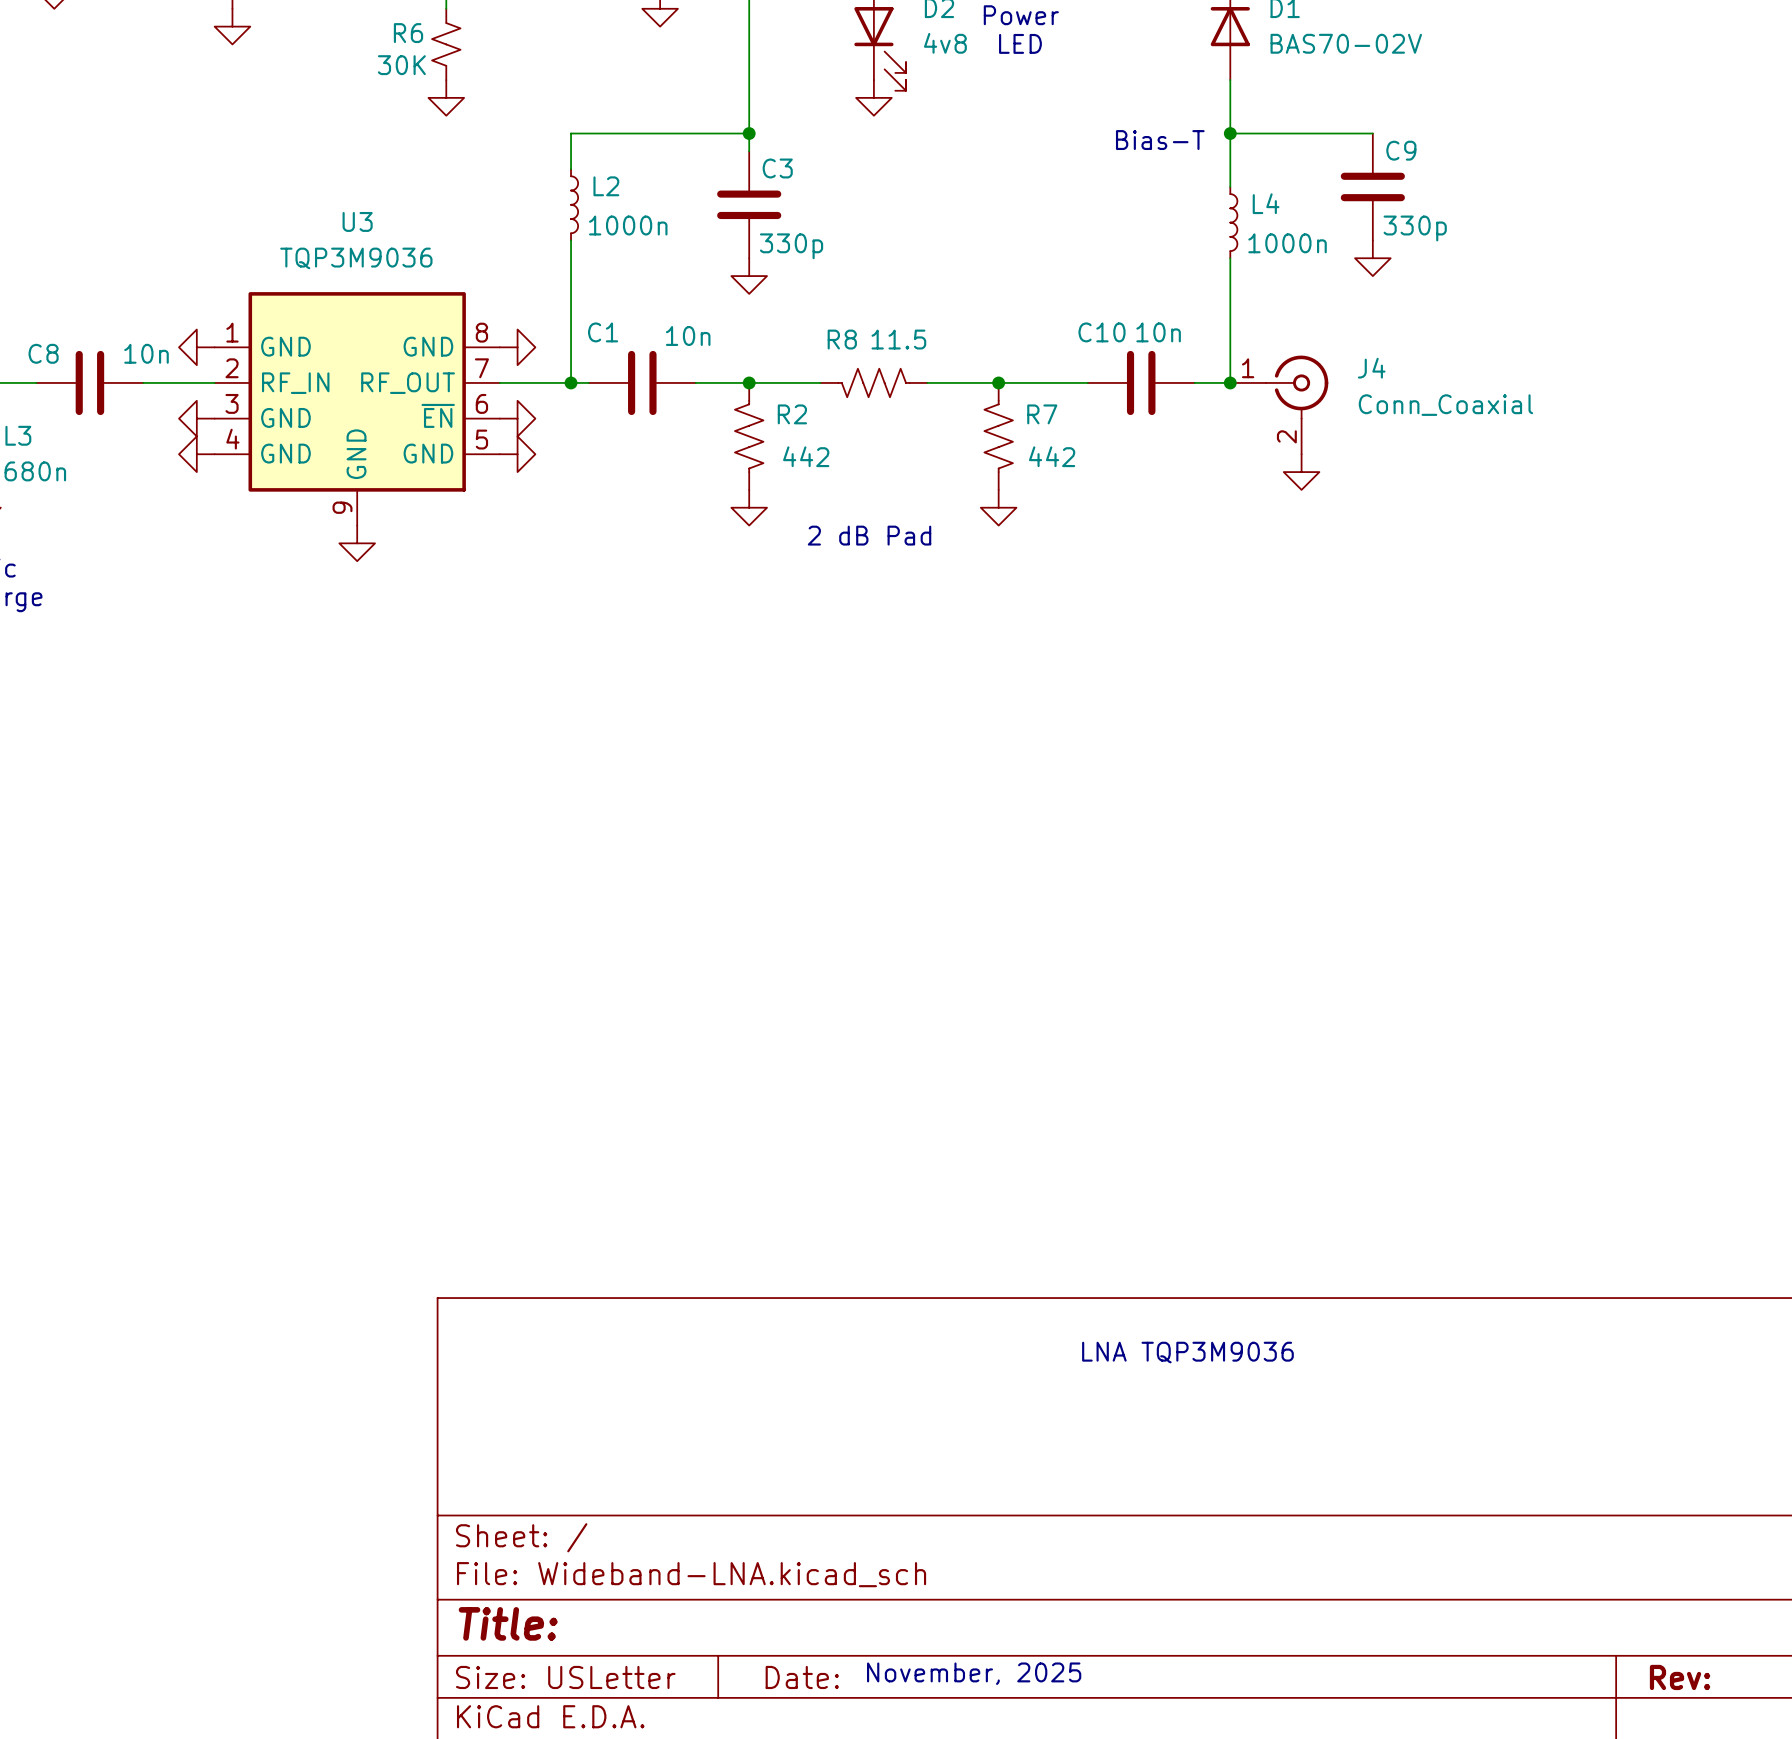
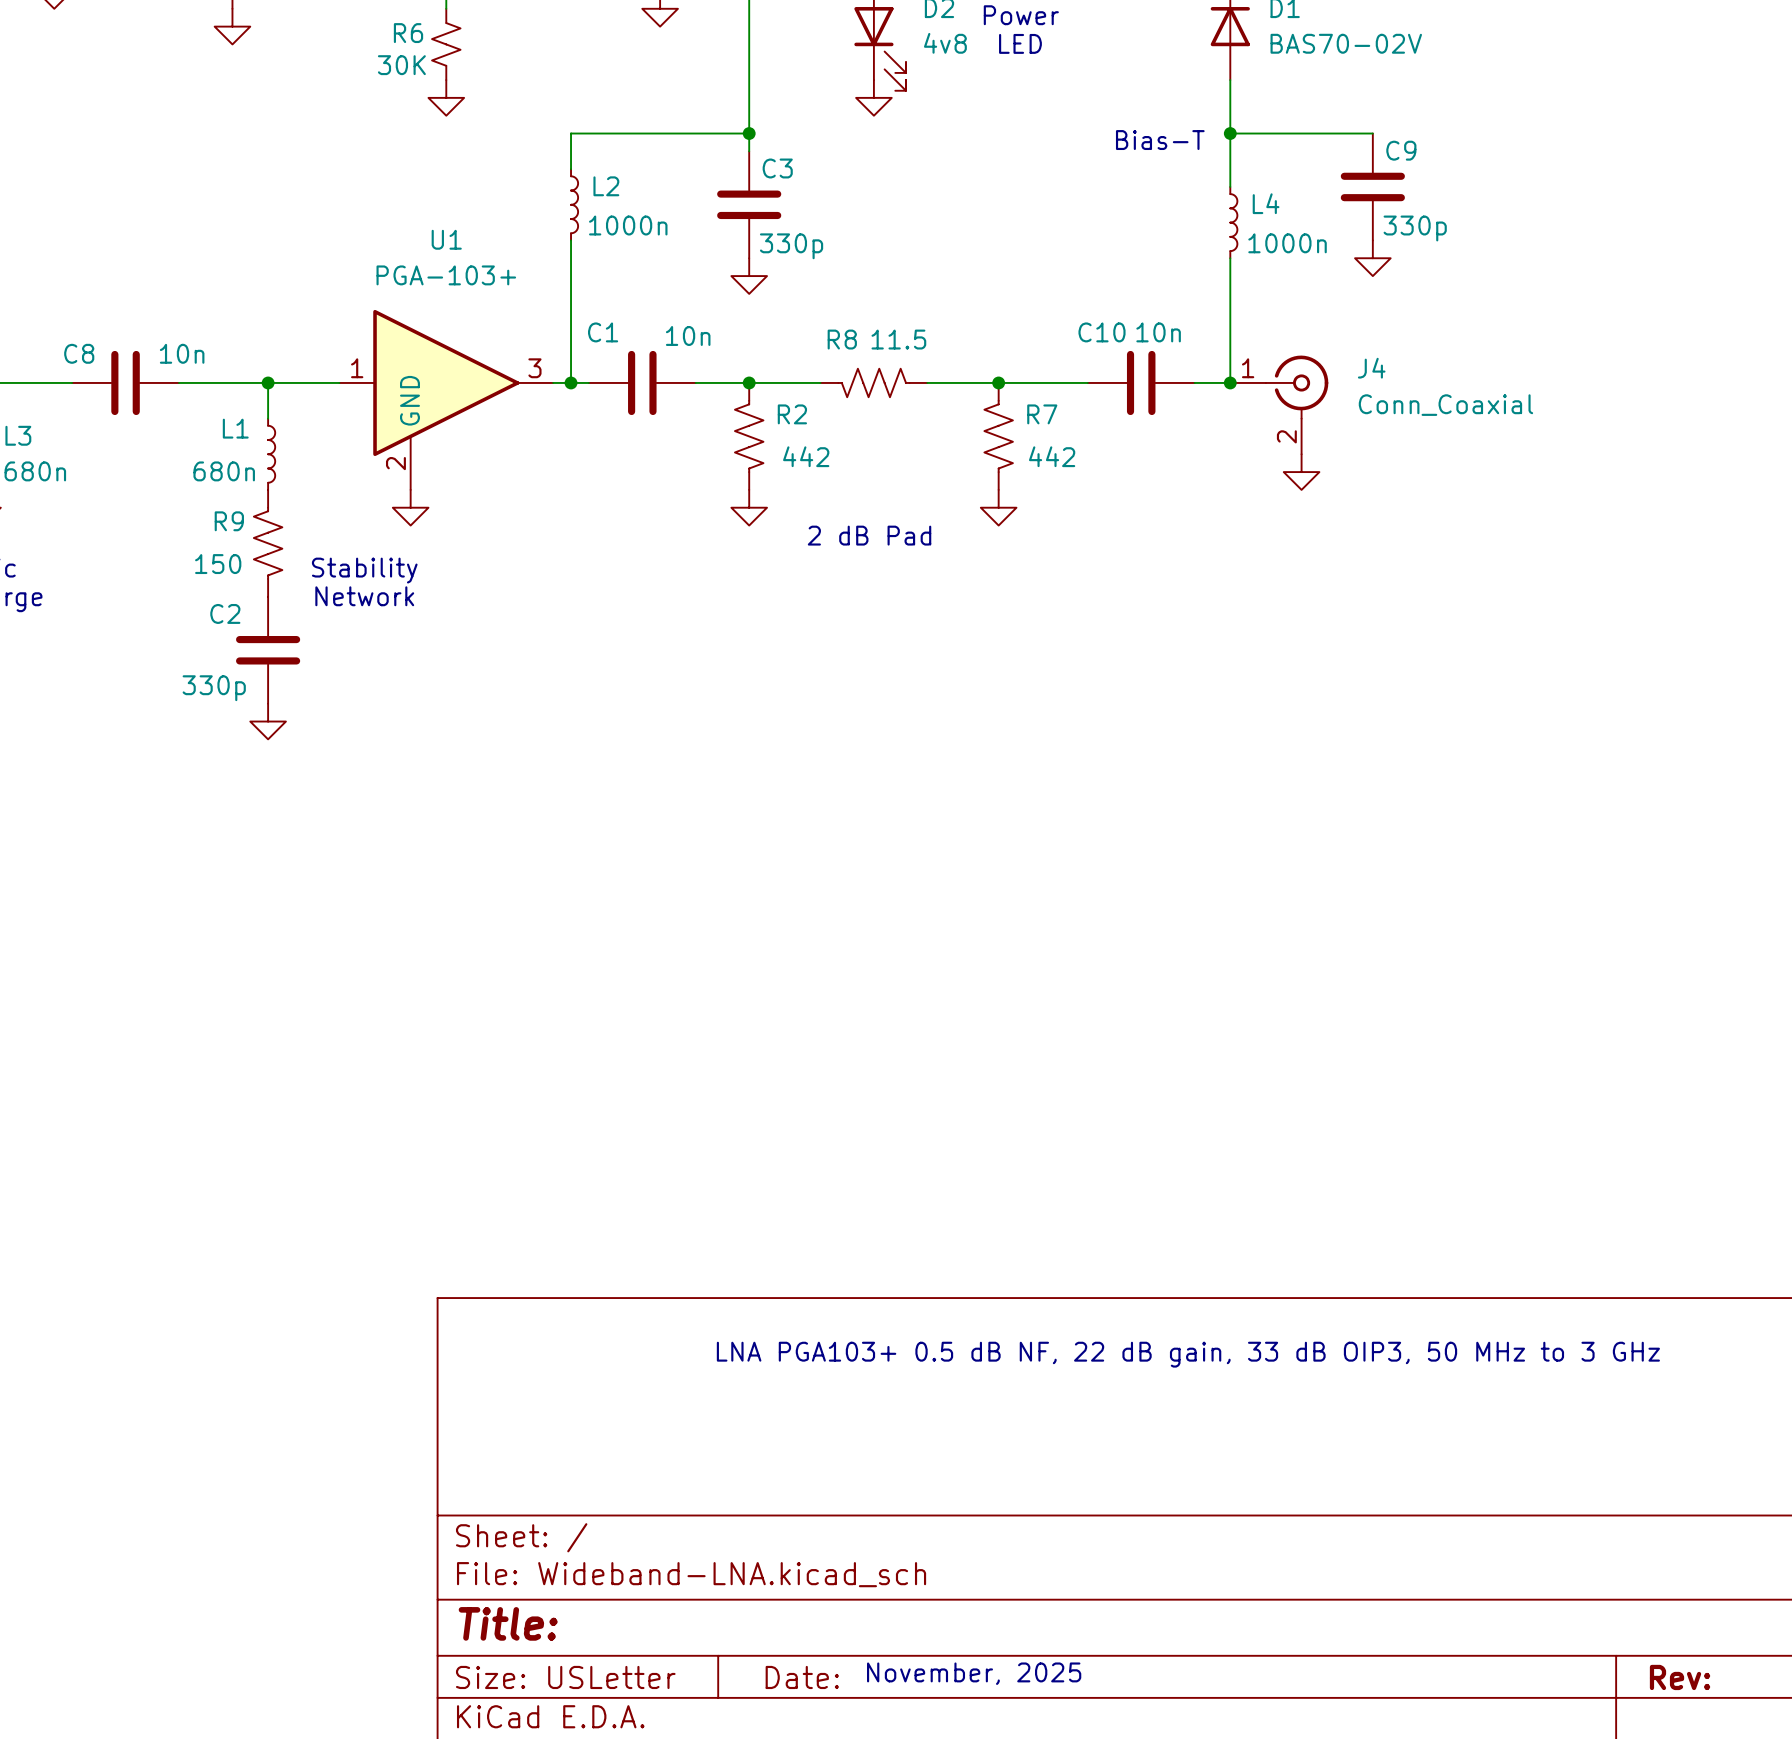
power symbol: (196, 347) -> none
power symbol: (517, 347) -> none
C8 position: (89, 382) -> (125, 382)
junction: none -> (268, 382)
U1: none -> PGA-103+ (446, 399)
U3: TQP3M9036 (357, 408) -> none
power symbol: (196, 418) -> none
power symbol: (517, 418) -> none
power symbol: (196, 454) -> none
L1: none -> 680n (271, 454)
power symbol: (517, 454) -> none
power symbol: none -> (410, 507)
R9: none -> 150 (268, 543)
power symbol: (357, 543) -> none
text: none -> Stability (364, 570)
text: none -> Network (364, 596)
C2: none -> 330p (268, 650)
power symbol: none -> (268, 721)
text: LNA TQP3M9036 (1187, 1352) -> LNA PGA103+ 0.5 dB NF, 22 dB gain, 33 dB OIP3, 50 MHz to 3 GHz (1188, 1354)

